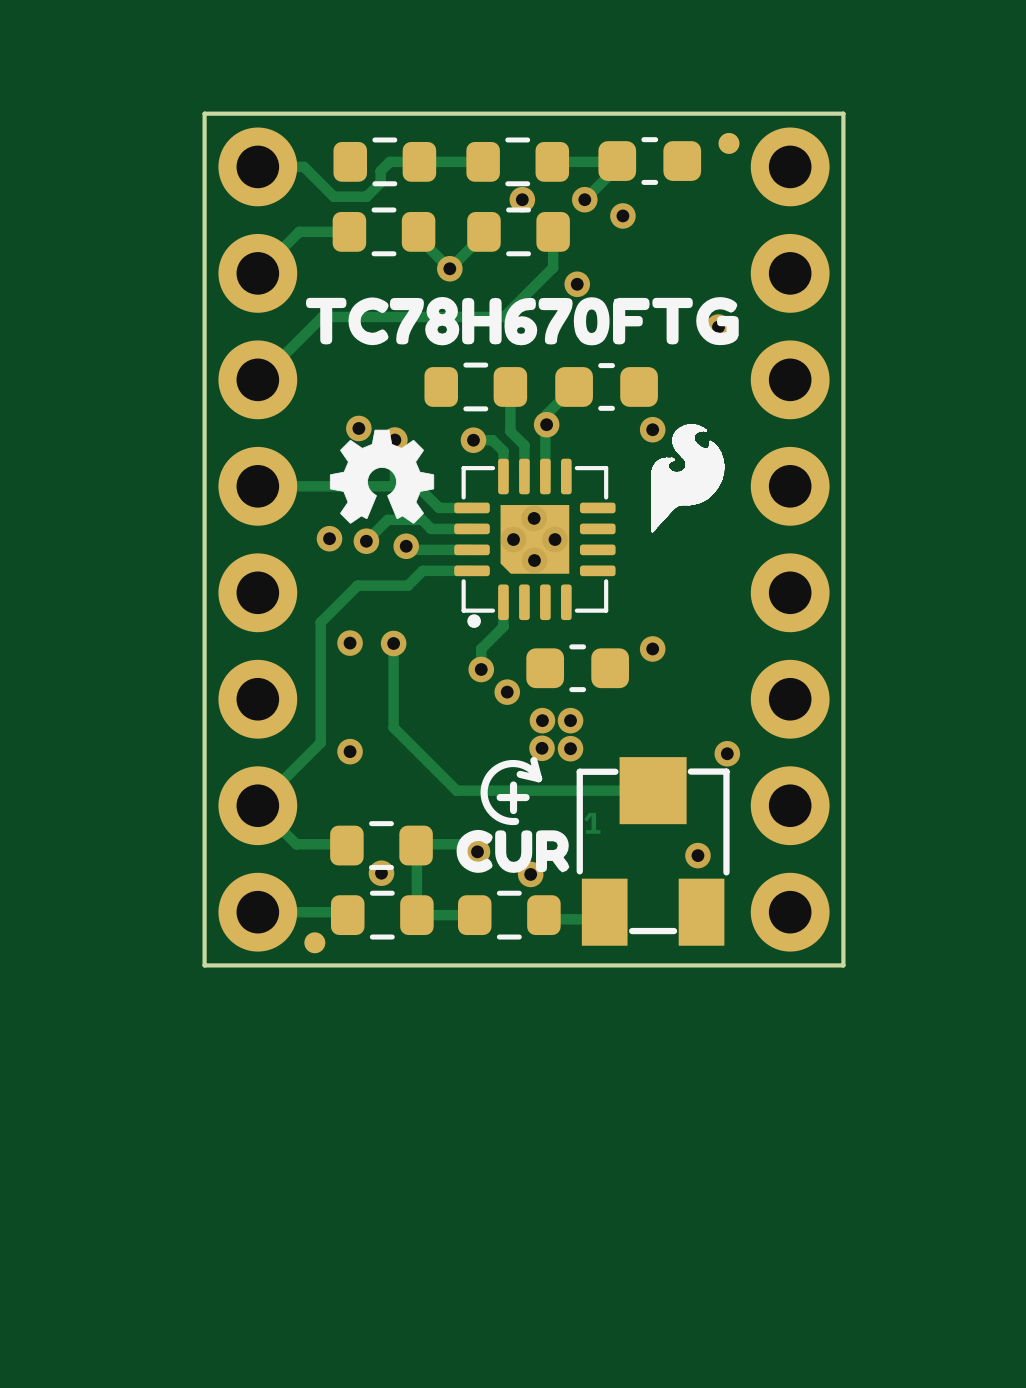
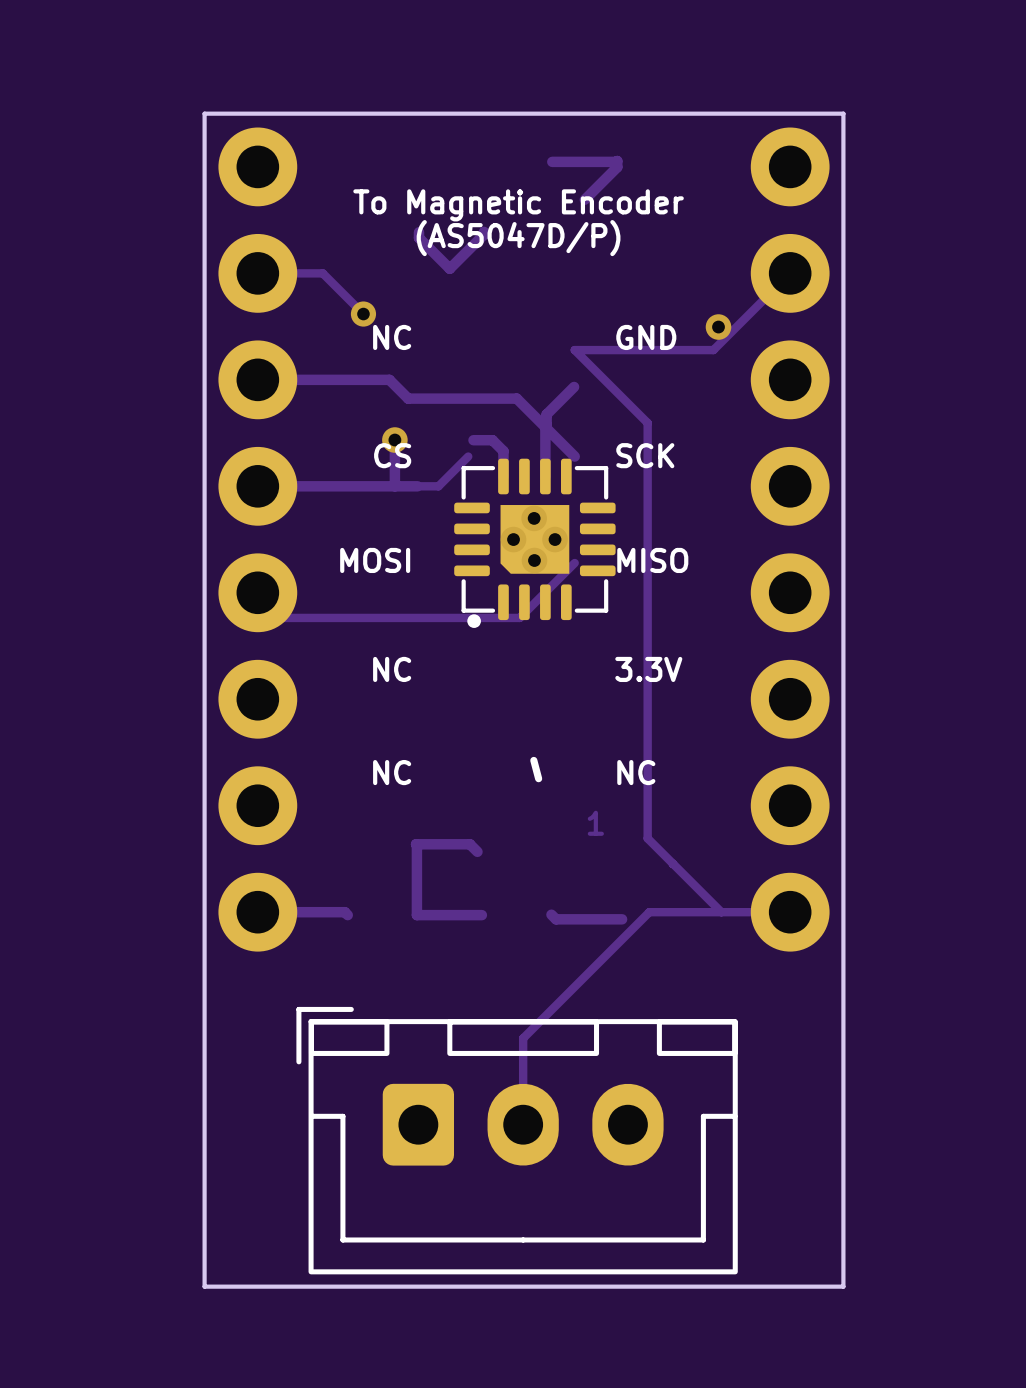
part: (728, 143) -> none
part: (384, 161) -> none
track: (483, 161) (389, 161) (380, 171) (380, 182) (366, 196) (333, 196) (304, 166) (257, 166) -> none
part: (517, 161) -> none
part: (649, 161) -> none
via: (522, 199) -> none
via: (584, 199) -> none
text: none -> To Magnetic Encoder (518, 205)
via: (622, 215) -> none
track: (349, 231) (299, 231) (257, 273) -> (363, 314) (322, 273) (257, 273)
part: (384, 231) -> none
part: (518, 231) -> none
track: (553, 231) (553, 267) (503, 316) (322, 316) (259, 379) -> (574, 456) (516, 398) (408, 398) (389, 379) (259, 379)
text: none -> (AS5047D/P) (518, 238)
via: (449, 268) -> none
track: none -> (790, 273) (713, 350) (574, 350) (647, 423) (647, 838) (672, 863)
via: (577, 284) -> none
drawing: [305, 296, 739, 346] -> none
via: none -> (363, 314)
text: none -> NC (392, 337)
text: none -> GND (646, 337)
part: (475, 386) -> none
track: (510, 386) (510, 431) (524, 445) (524, 476) -> none
part: (606, 386) -> none
via: (546, 424) -> none
drawing: [651, 424, 725, 533] -> none
via: (358, 428) -> none
drawing: [329, 429, 435, 524] -> none
via: (652, 429) -> none
via: (473, 440) -> none
text: none -> CS (392, 455)
text: none -> SCK (645, 455)
track: (417, 486) (439, 507) (472, 507) -> (417, 486) (438, 486) (468, 456)
track: (472, 528) (431, 528) (422, 519) (387, 519) (366, 541) -> none
via: (329, 538) -> none
via: (366, 541) -> none
track: (406, 546) (409, 549) (472, 549) -> none
via: (406, 546) -> none
text: none -> MOSI (375, 560)
text: none -> MISO (652, 560)
track: none -> (574, 563) (519, 617) (282, 617) (257, 592)
track: (472, 570) (422, 570) (407, 585) (357, 585) (320, 622) (320, 742) (257, 805) (296, 844) (346, 844) -> none
track: (503, 602) (503, 626) (481, 648) (481, 669) -> none
via: (350, 643) -> none
track: (393, 643) (393, 727) (456, 790) (653, 790) -> none
via: (393, 643) -> none
via: (652, 648) -> none
part: (577, 668) -> none
text: none -> NC (392, 669)
via: (481, 669) -> none
text: none -> 3.3V (648, 669)
via: (507, 692) -> none
via: (542, 720) -> none
via: (570, 720) -> none
via: (542, 748) -> none
via: (570, 748) -> none
via: (350, 751) -> none
via: (727, 753) -> none
text: none -> NC (392, 772)
text: none -> NC (636, 772)
line: (520, 774) (538, 778) (525, 766) (507, 764) (491, 772) (484, 789) (486, 803) (492, 812) (501, 819) (515, 821) -> none
line: (513, 784) (513, 810) -> none
line: (500, 797) (526, 797) -> none
drawing: [456, 829, 570, 873] -> none
part: (381, 845) -> none
via: (477, 851) -> none
part: (653, 851) -> none
via: (697, 855) -> none
track: none -> (673, 863) (721, 912)
via: (381, 873) -> none
via: (530, 874) -> none
track: none -> (790, 912) (649, 912) (523, 1038) (523, 1124)
part: (382, 915) -> none
part: (509, 915) -> none
part: (314, 942) -> none
board edge: (204, 965) (843, 965) -> (204, 965) (204, 1286) (843, 1286) (843, 965)
part: none -> (517, 1140)

